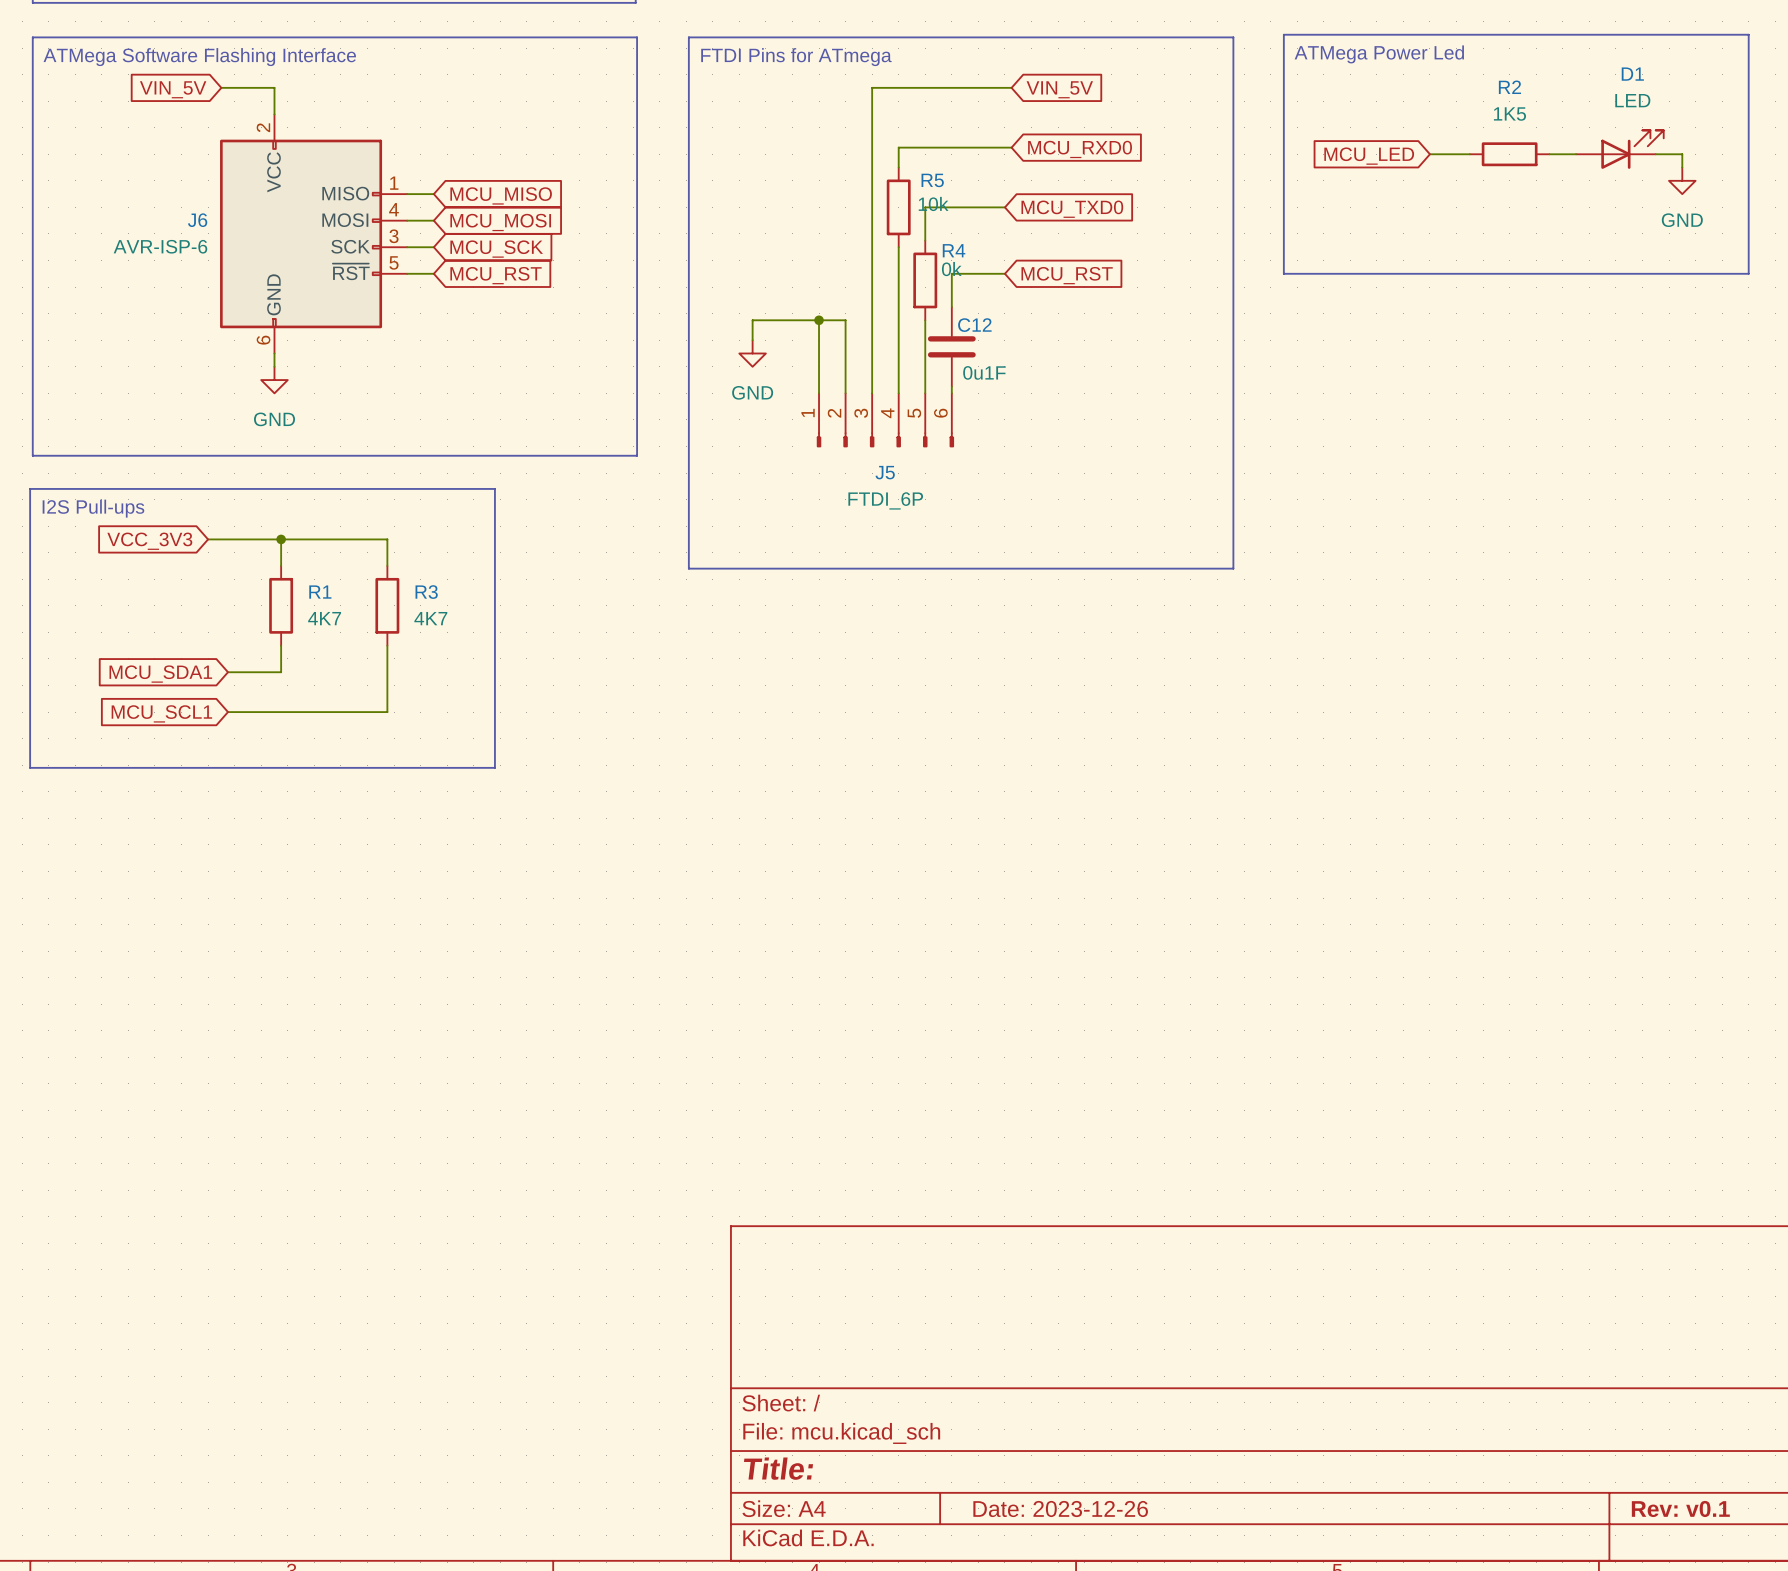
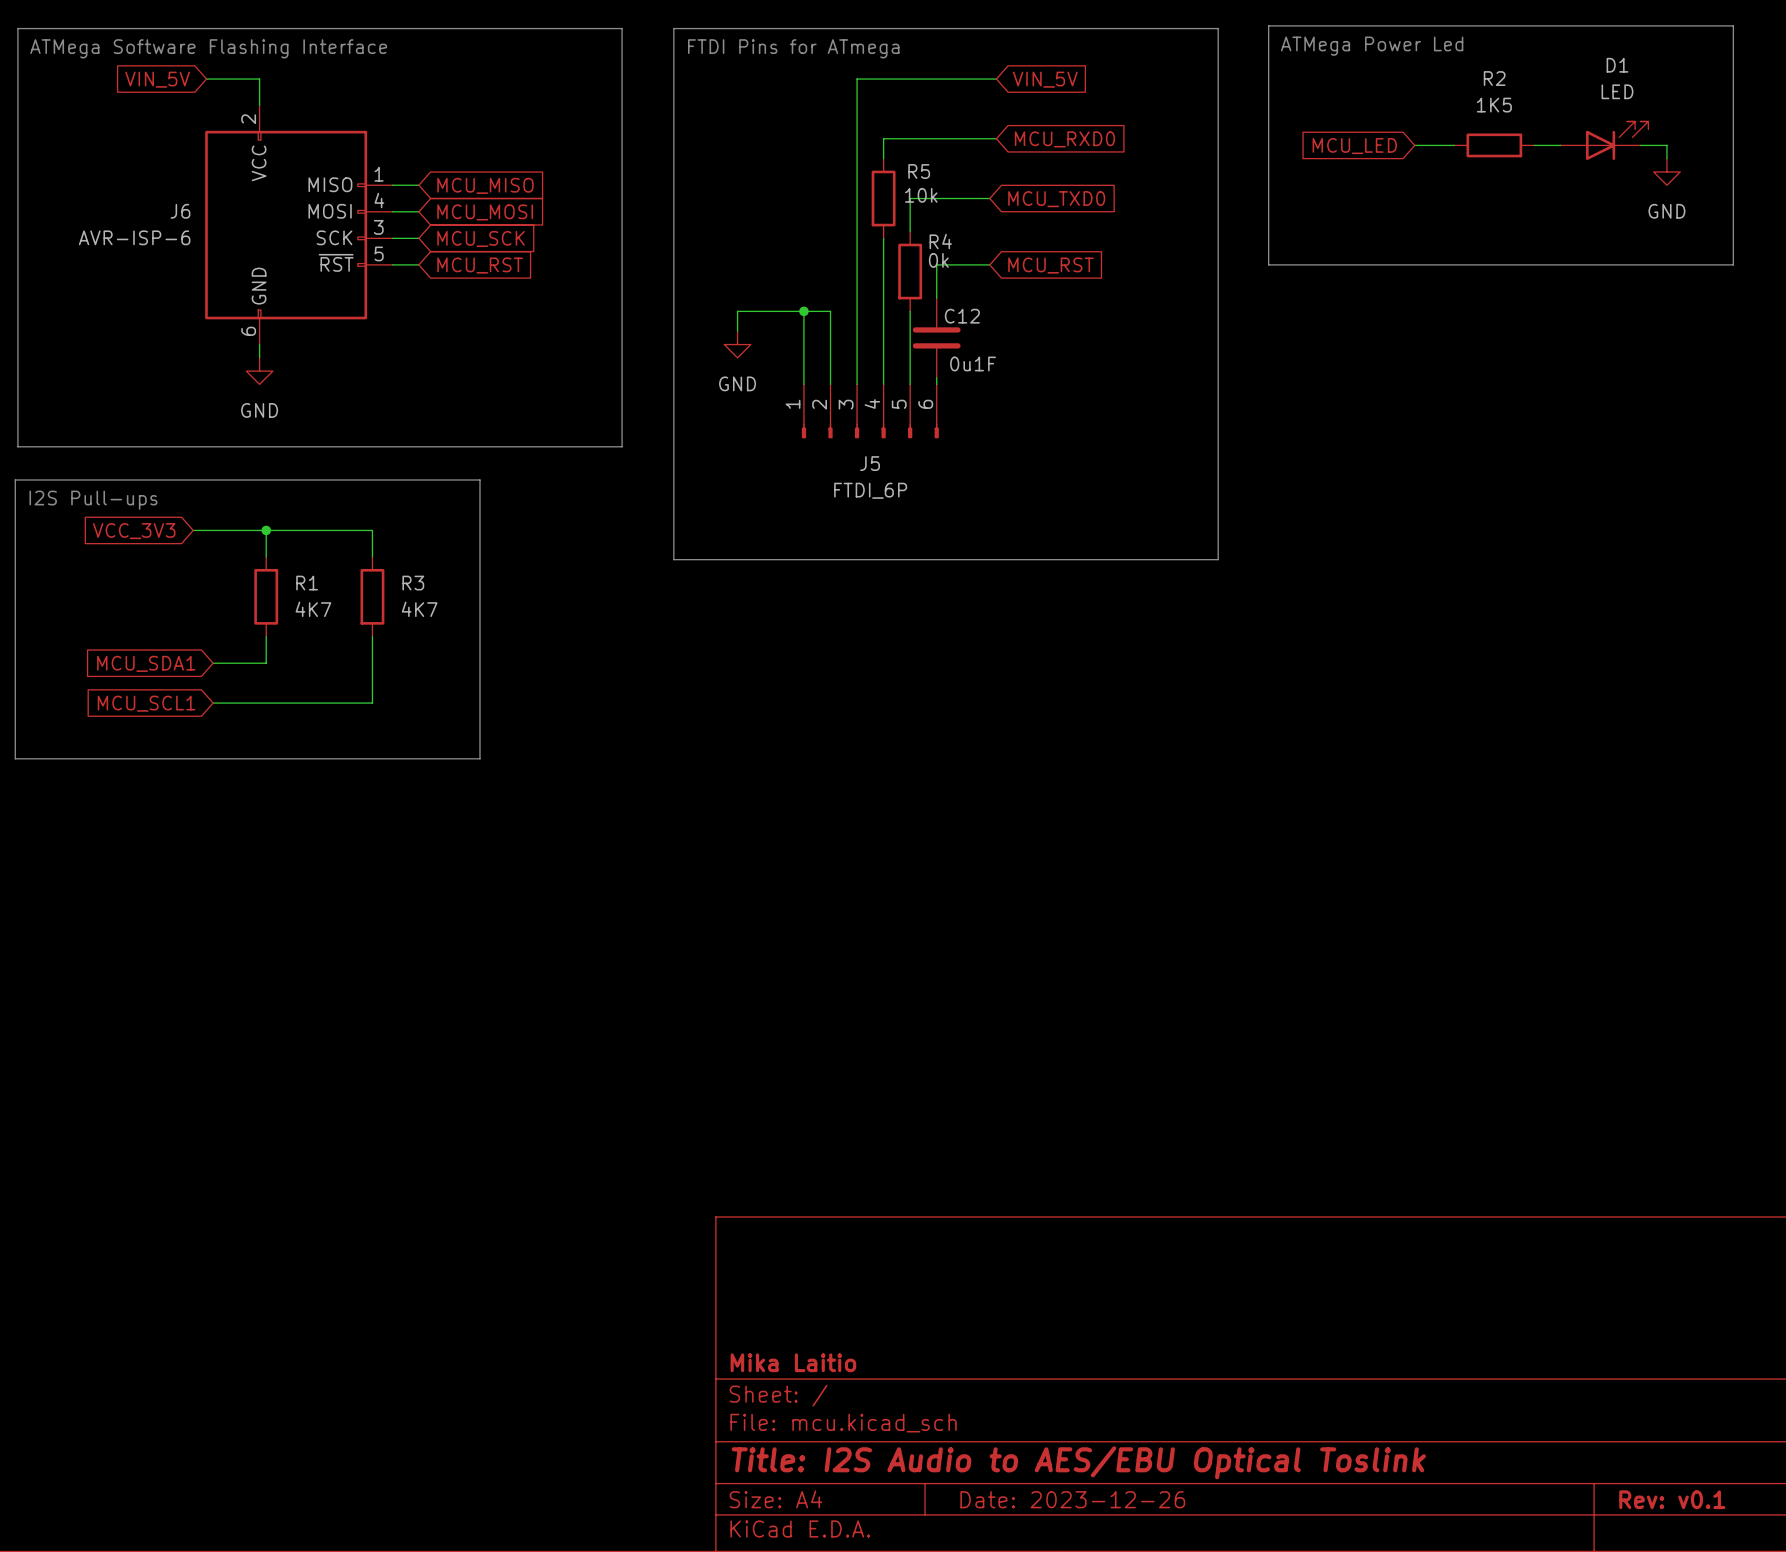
title block: none -> Mika Laitio (793, 1362)
title block: Title: (778, 1468) -> Title: I2S Audio to AES/EBU Optical Toslink (1078, 1462)

